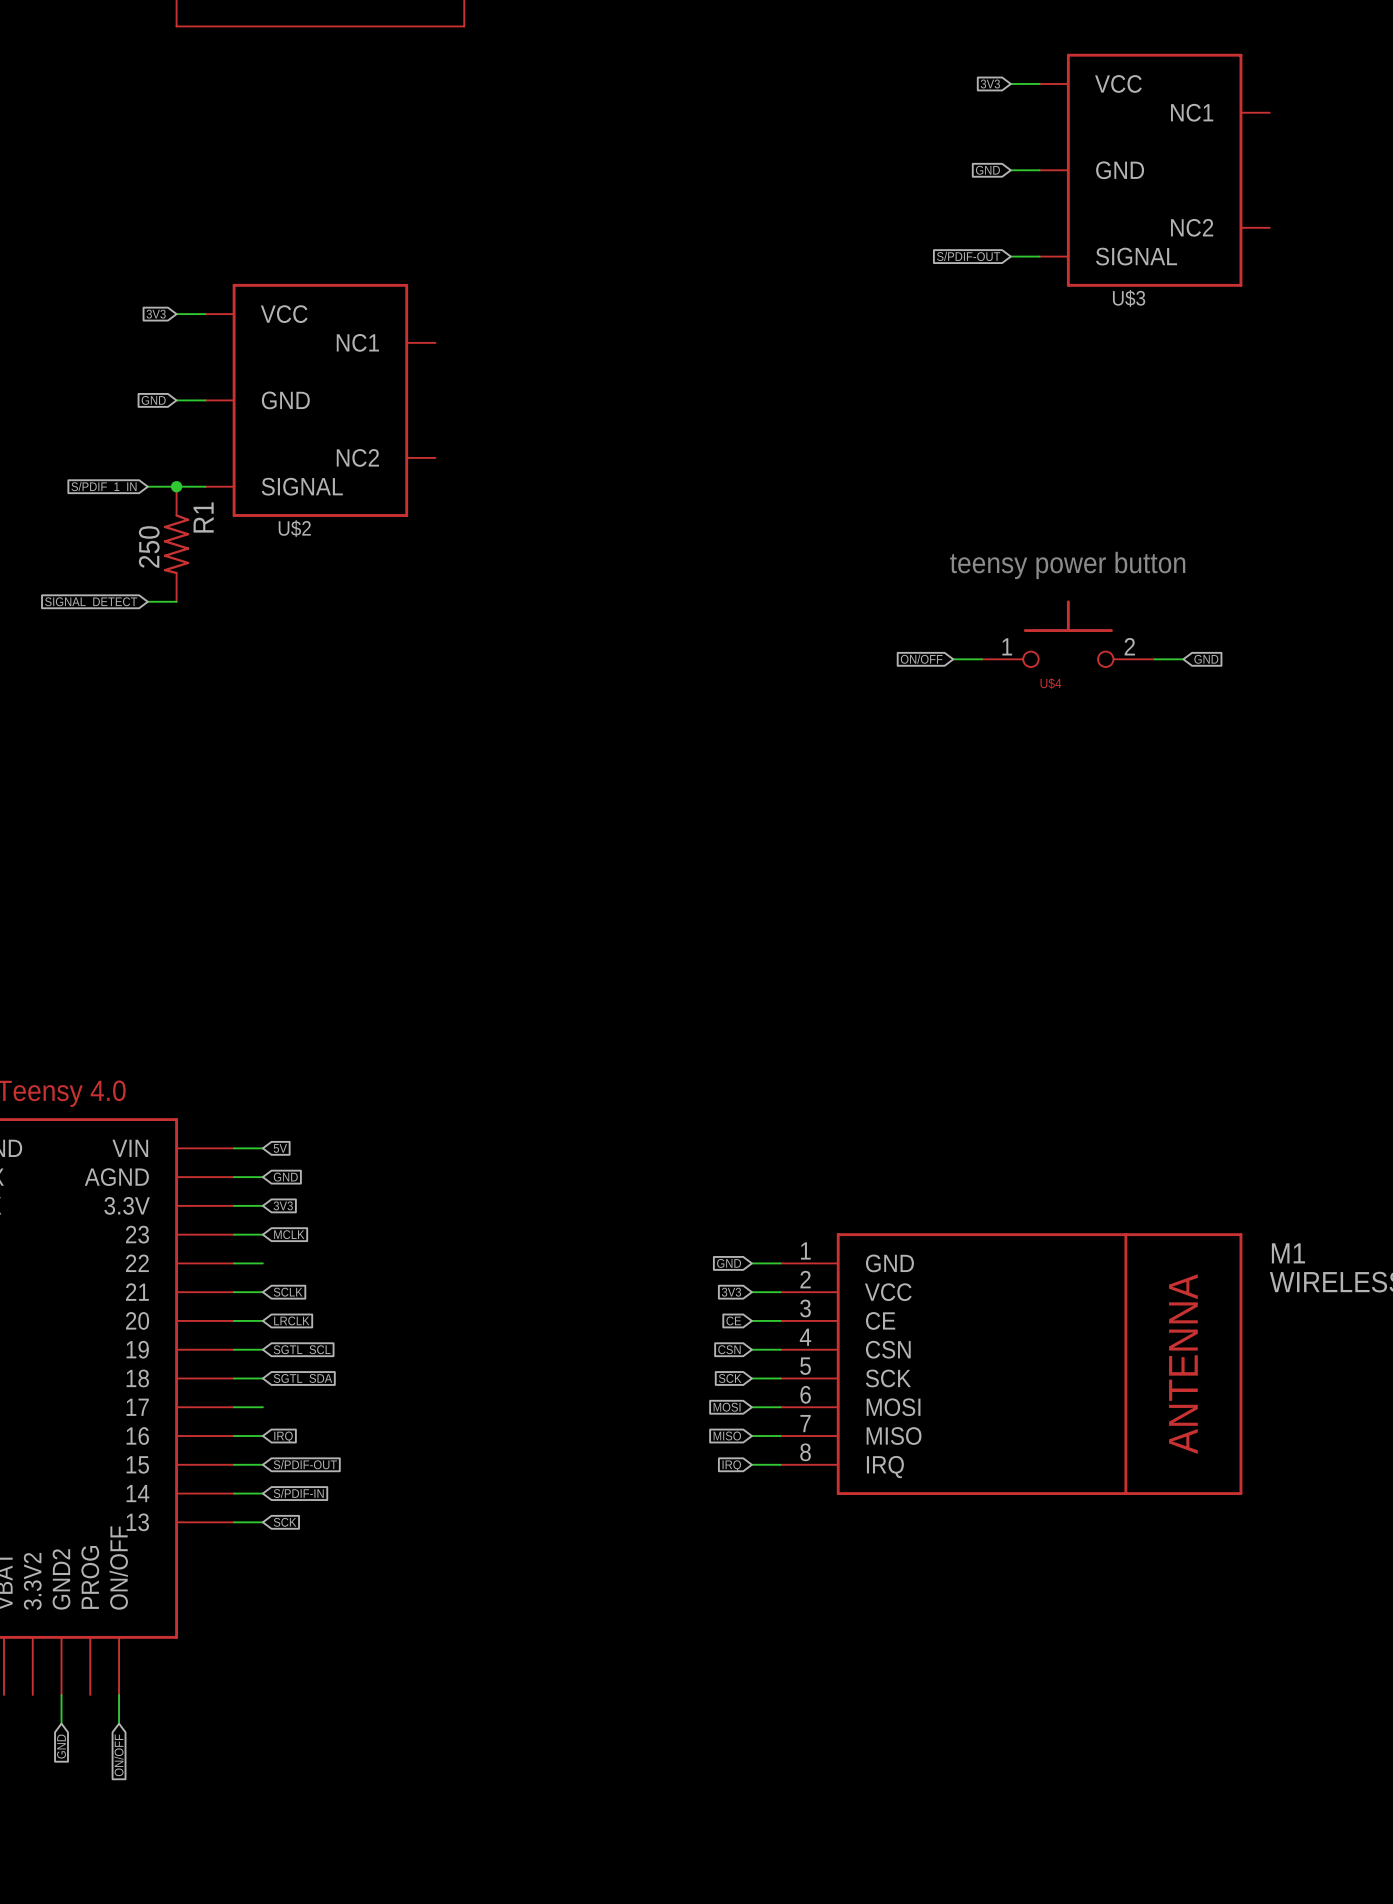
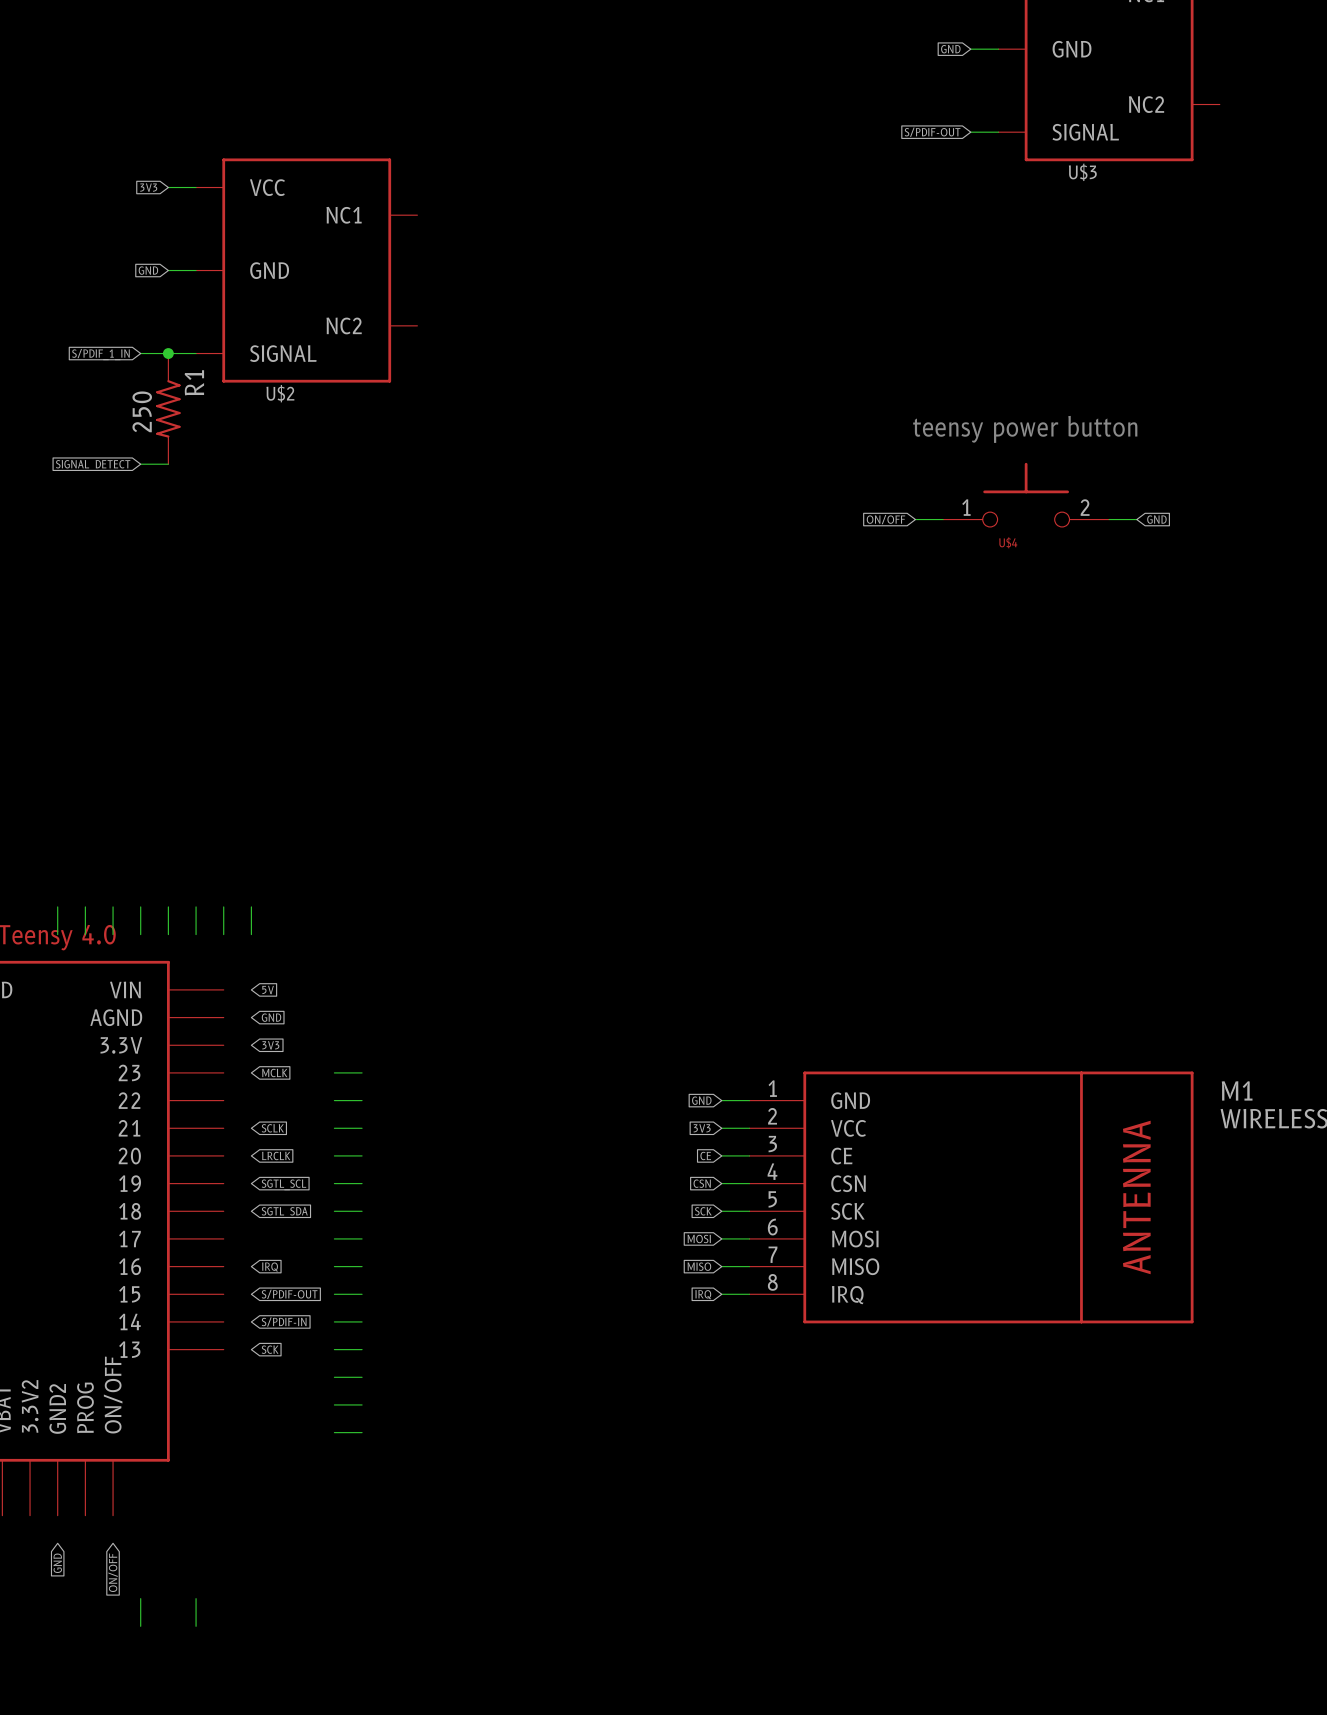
wire: none -> (57, 906) (57, 934)
wire: none -> (85, 906) (85, 934)
wire: none -> (113, 906) (113, 934)
wire: none -> (140, 906) (140, 934)
wire: none -> (168, 906) (168, 934)
wire: none -> (196, 906) (196, 934)
wire: none -> (223, 906) (223, 934)
wire: none -> (251, 906) (251, 934)
wire: (234, 1148) (262, 1148) -> (334, 1072) (362, 1072)
wire: (234, 1177) (262, 1177) -> (334, 1100) (362, 1100)
wire: (234, 1205) (262, 1205) -> (334, 1128) (362, 1128)
wire: (234, 1234) (262, 1234) -> (334, 1155) (362, 1155)
wire: (234, 1263) (262, 1263) -> (334, 1183) (362, 1183)
wire: (234, 1292) (262, 1292) -> (334, 1211) (362, 1211)
wire: (234, 1320) (262, 1320) -> (334, 1238) (362, 1238)
wire: (234, 1349) (262, 1349) -> (334, 1266) (362, 1266)
wire: (234, 1378) (262, 1378) -> (334, 1294) (362, 1294)
wire: (234, 1407) (262, 1407) -> (334, 1321) (362, 1321)
wire: (234, 1436) (262, 1436) -> (334, 1349) (362, 1349)
wire: (234, 1464) (262, 1464) -> (334, 1377) (362, 1377)
wire: (234, 1493) (262, 1493) -> (334, 1404) (362, 1404)
wire: (234, 1522) (262, 1522) -> (334, 1432) (362, 1432)
wire: (61, 1694) (61, 1723) -> (196, 1598) (196, 1626)
wire: (119, 1694) (119, 1723) -> (140, 1598) (140, 1626)

